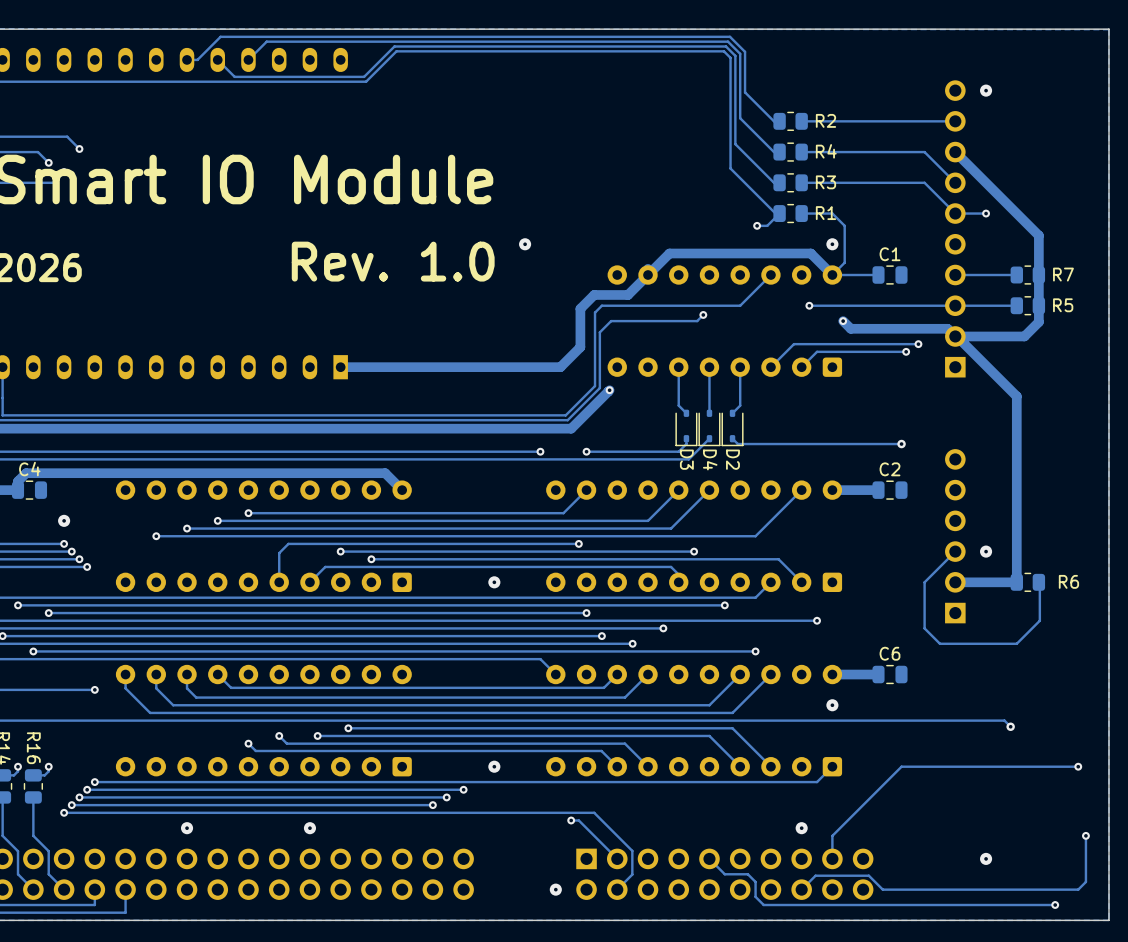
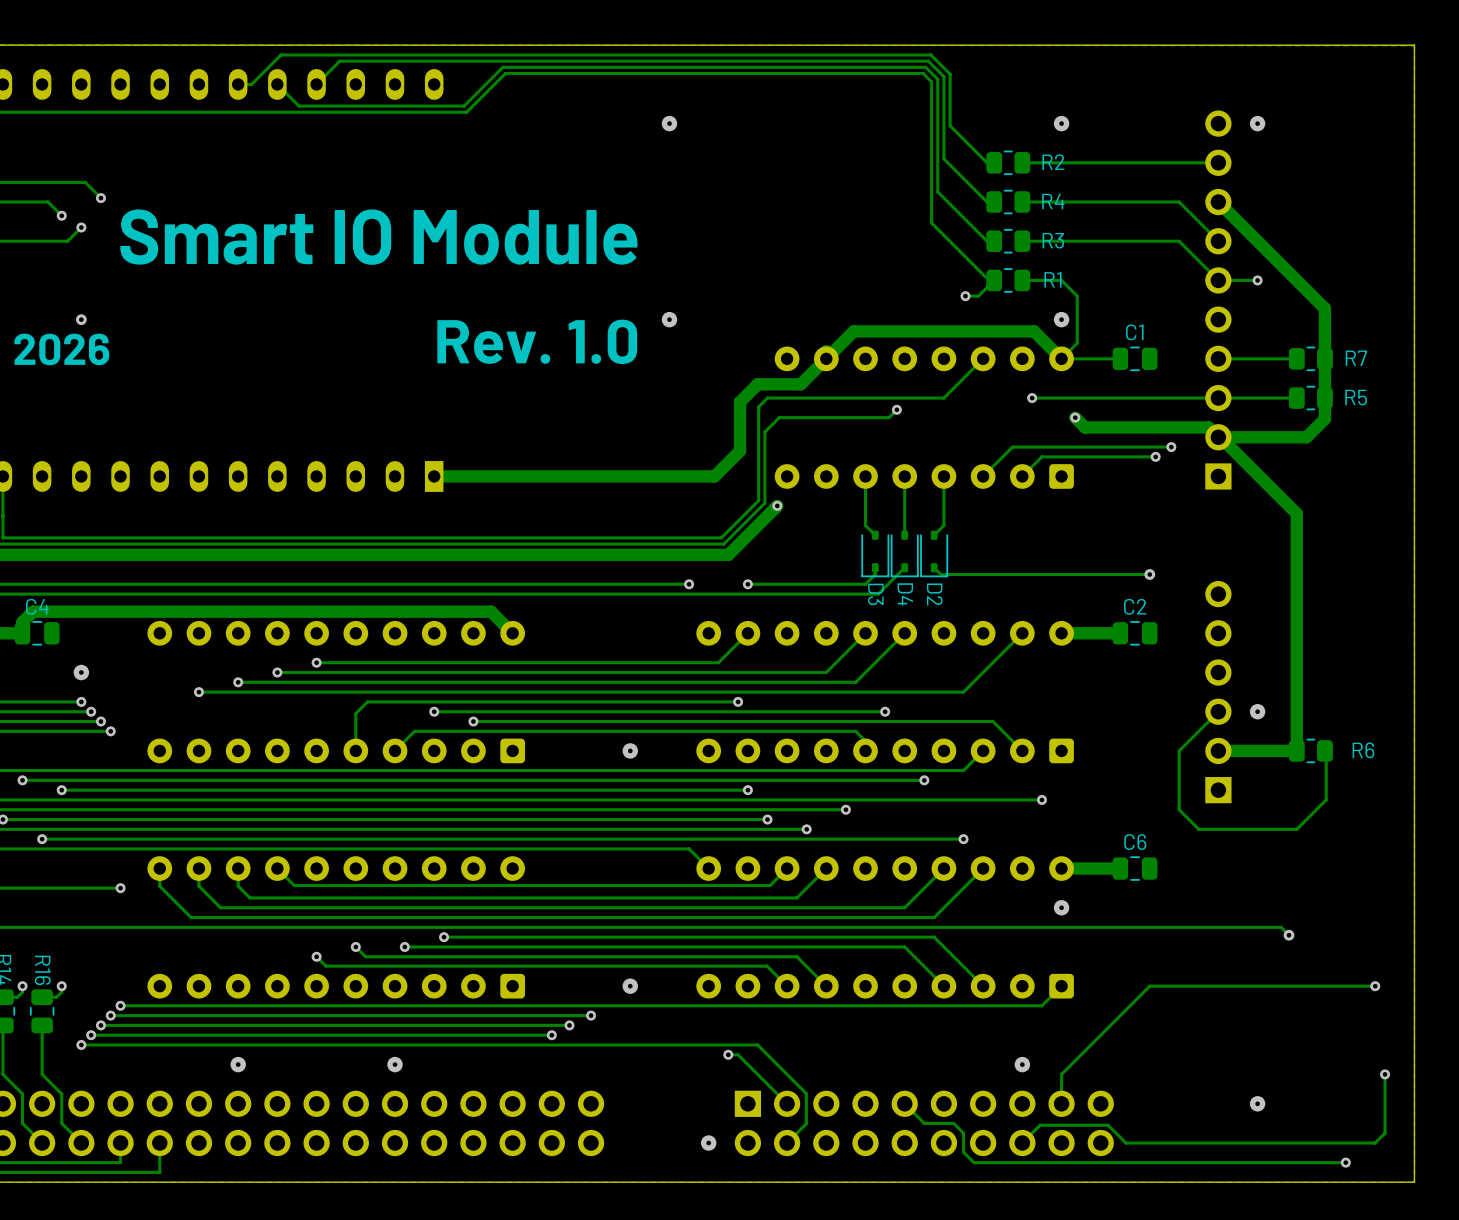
via: none -> (669, 123)
via: none -> (1061, 123)
via: none -> (81, 319)

